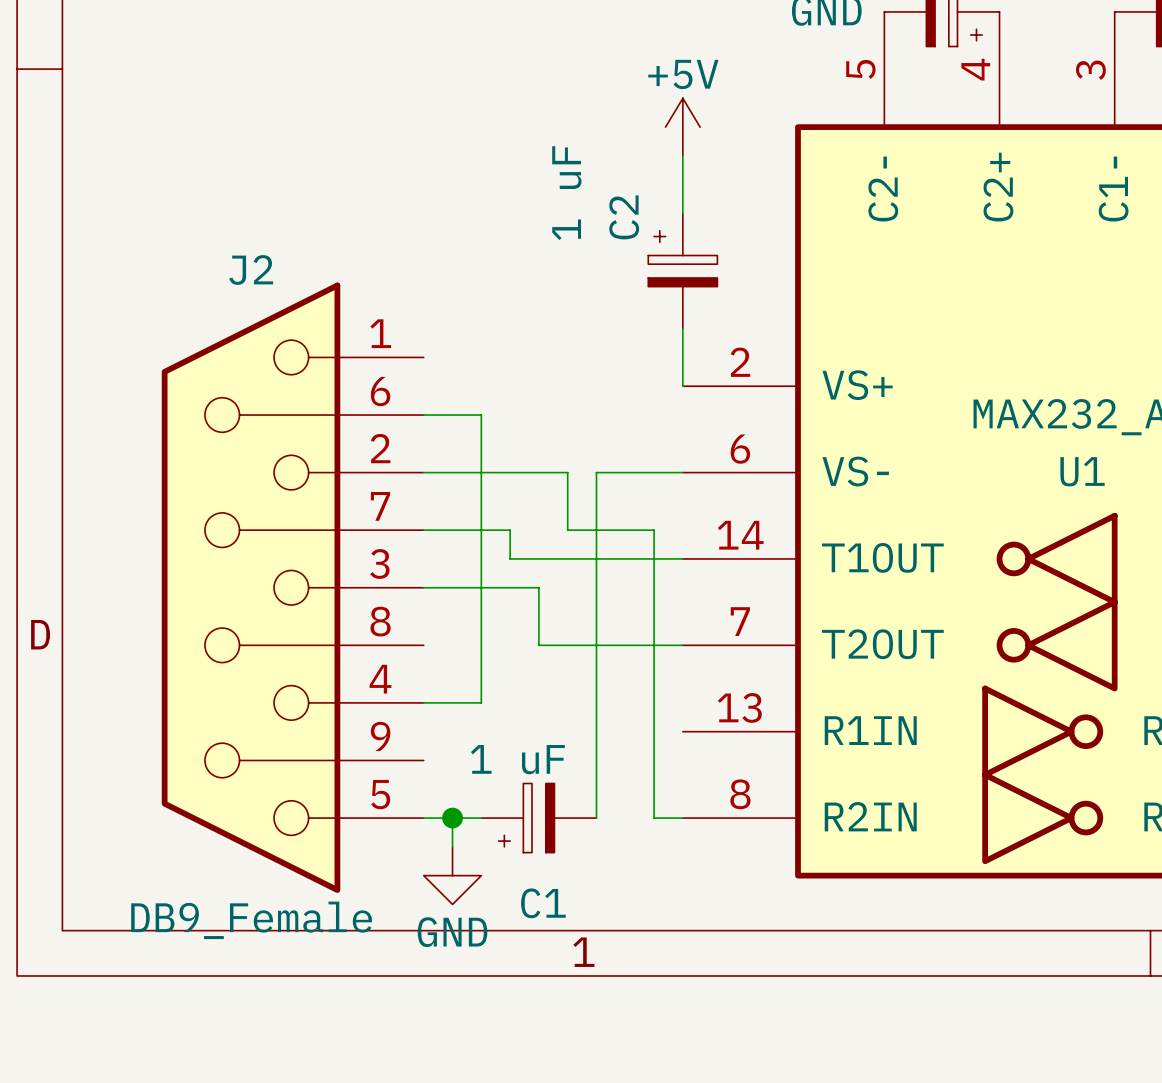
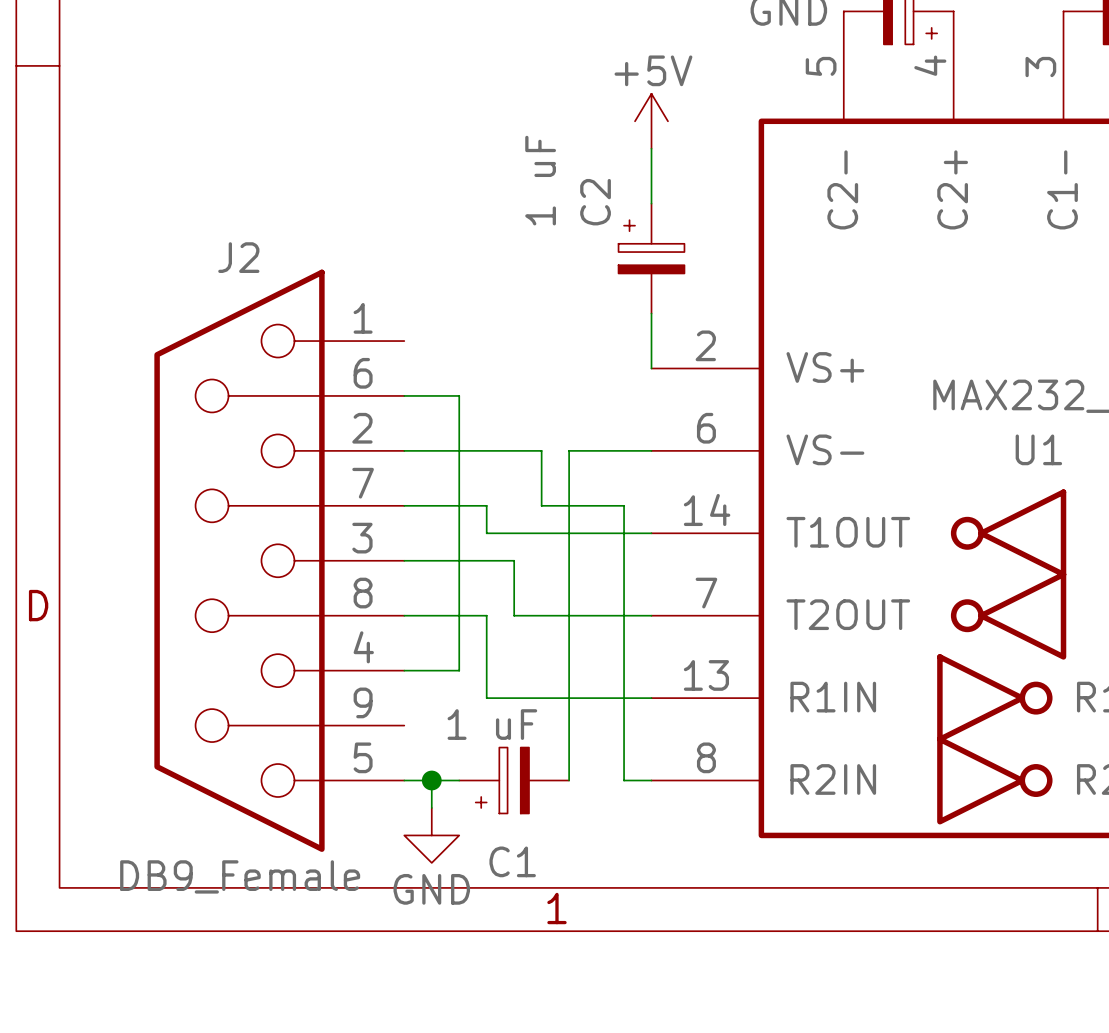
wire: none -> (404, 615) (486, 615) (486, 698) (651, 698)

